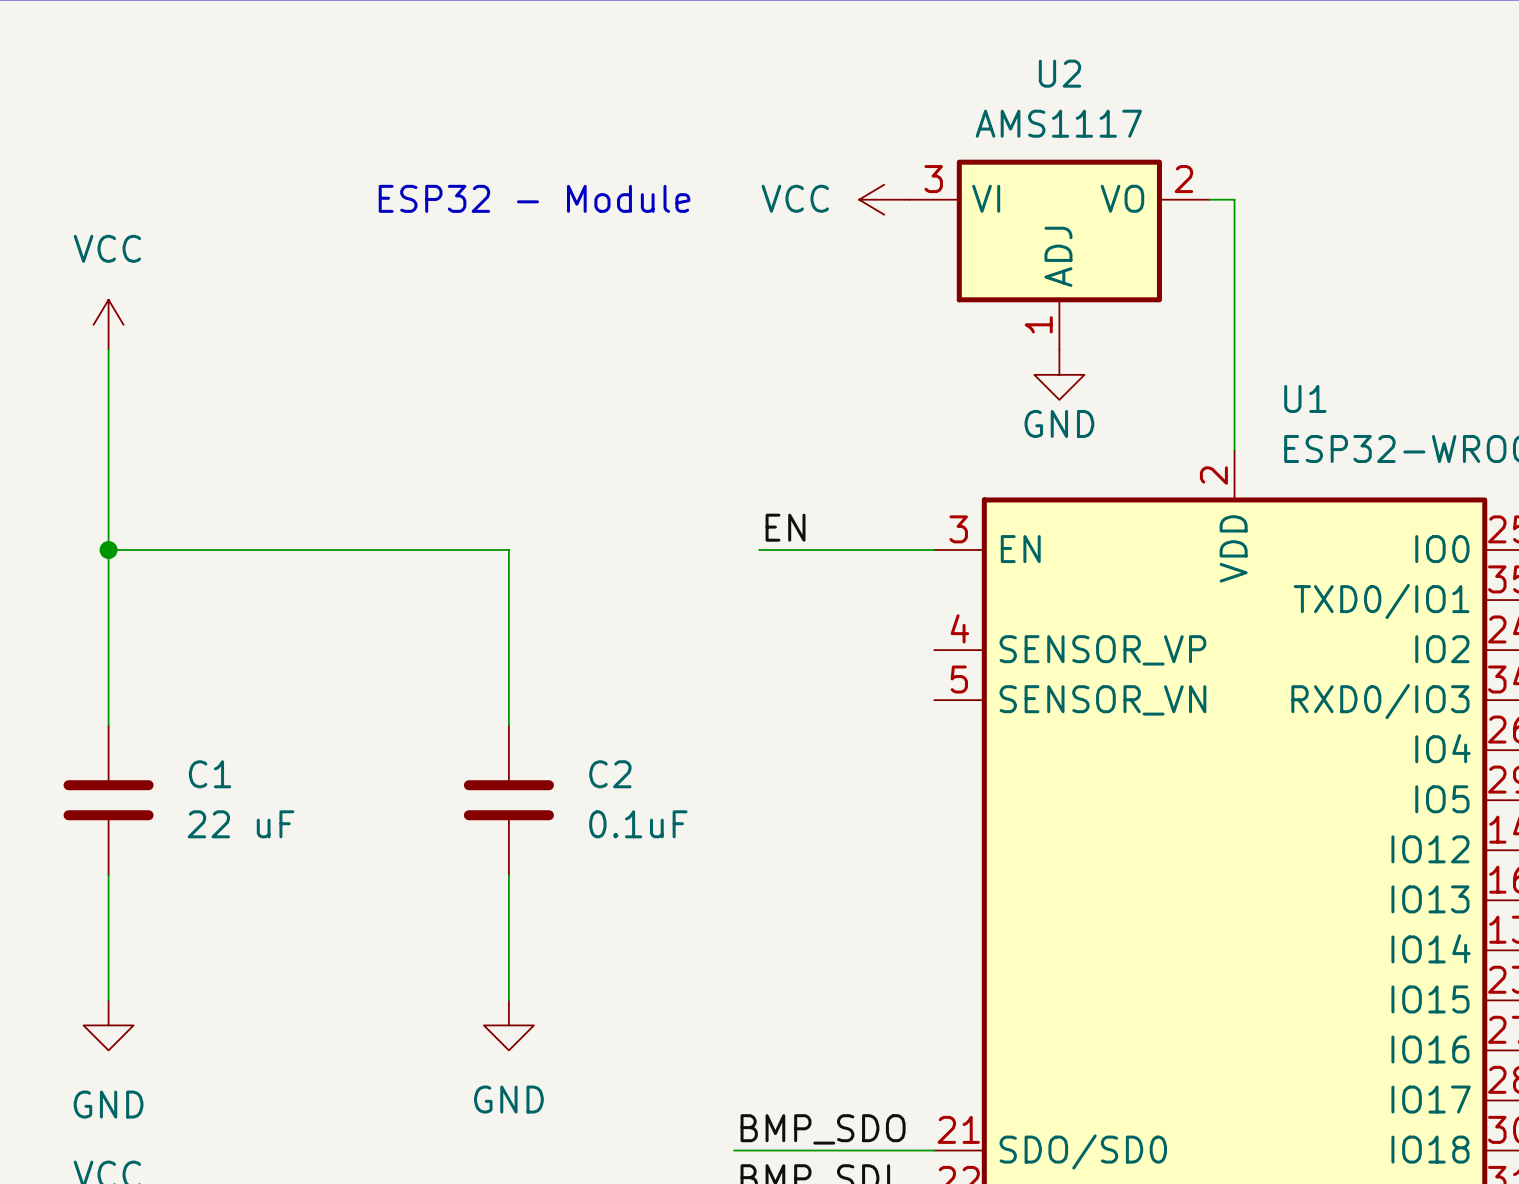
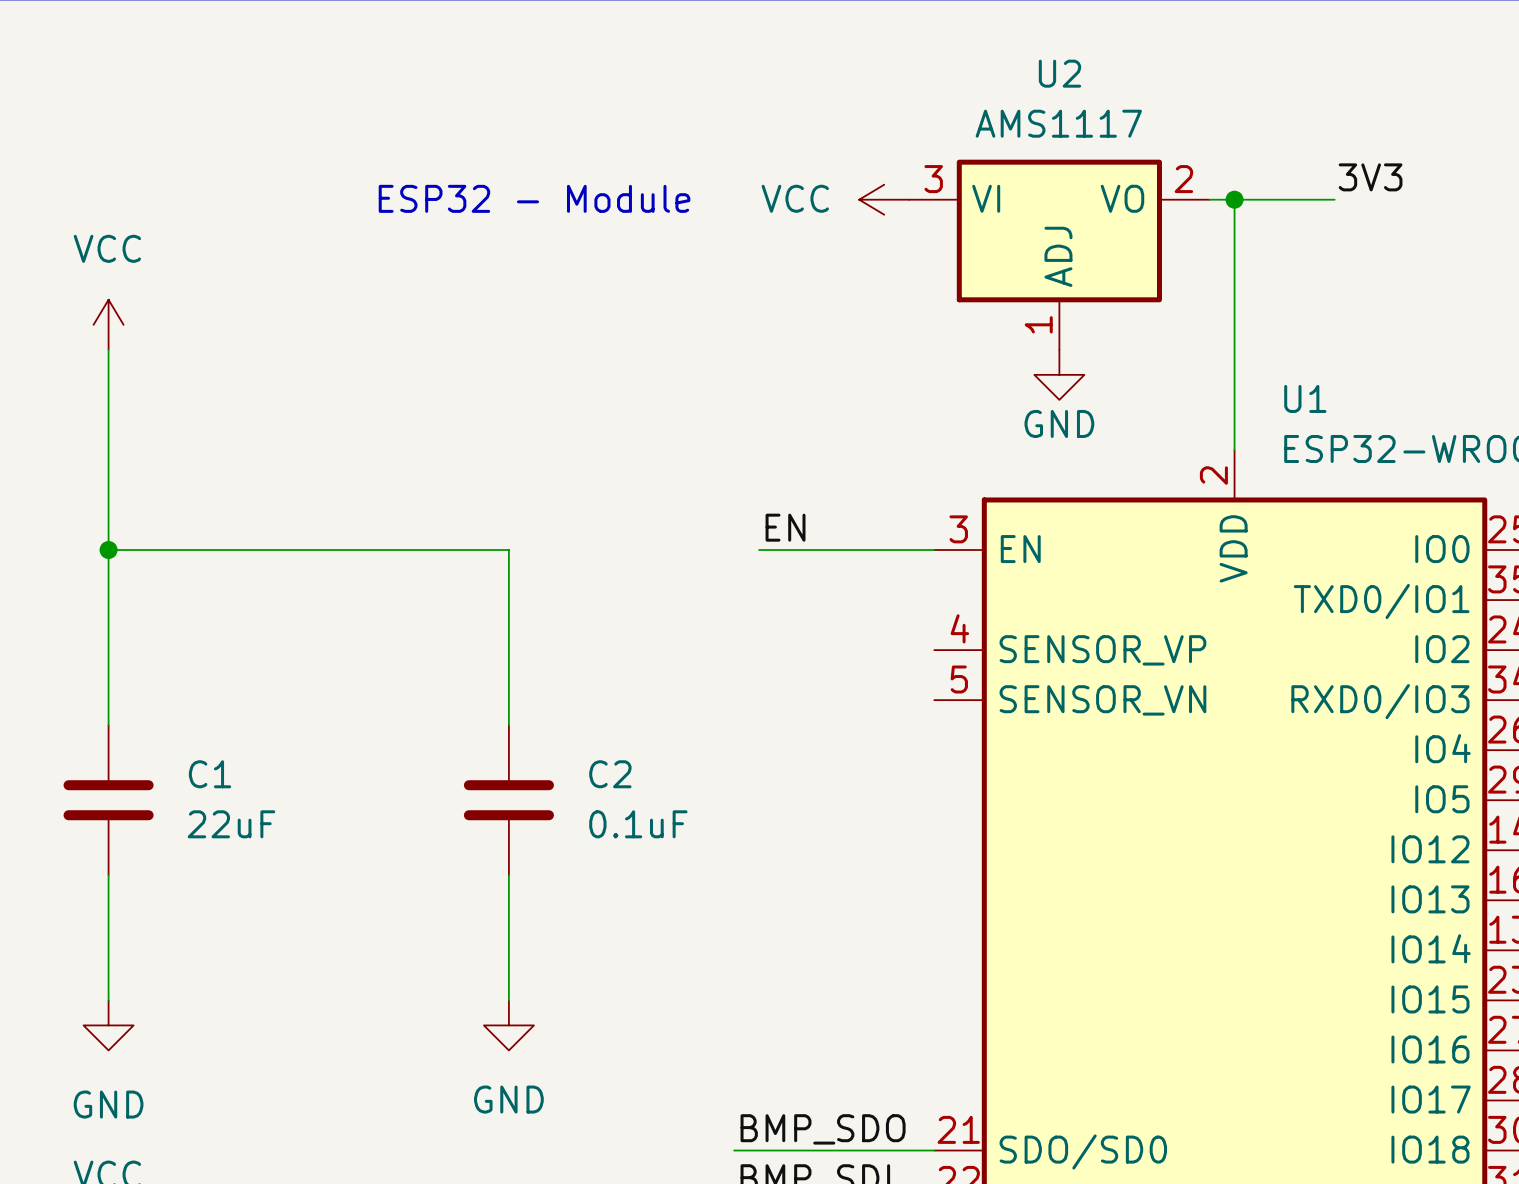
label: none -> 3V3 (1370, 177)
wire: none -> (1234, 199) (1334, 199)
junction: none -> (1234, 199)
C1 value: 22 uF (241, 824) -> 22uF (231, 824)

